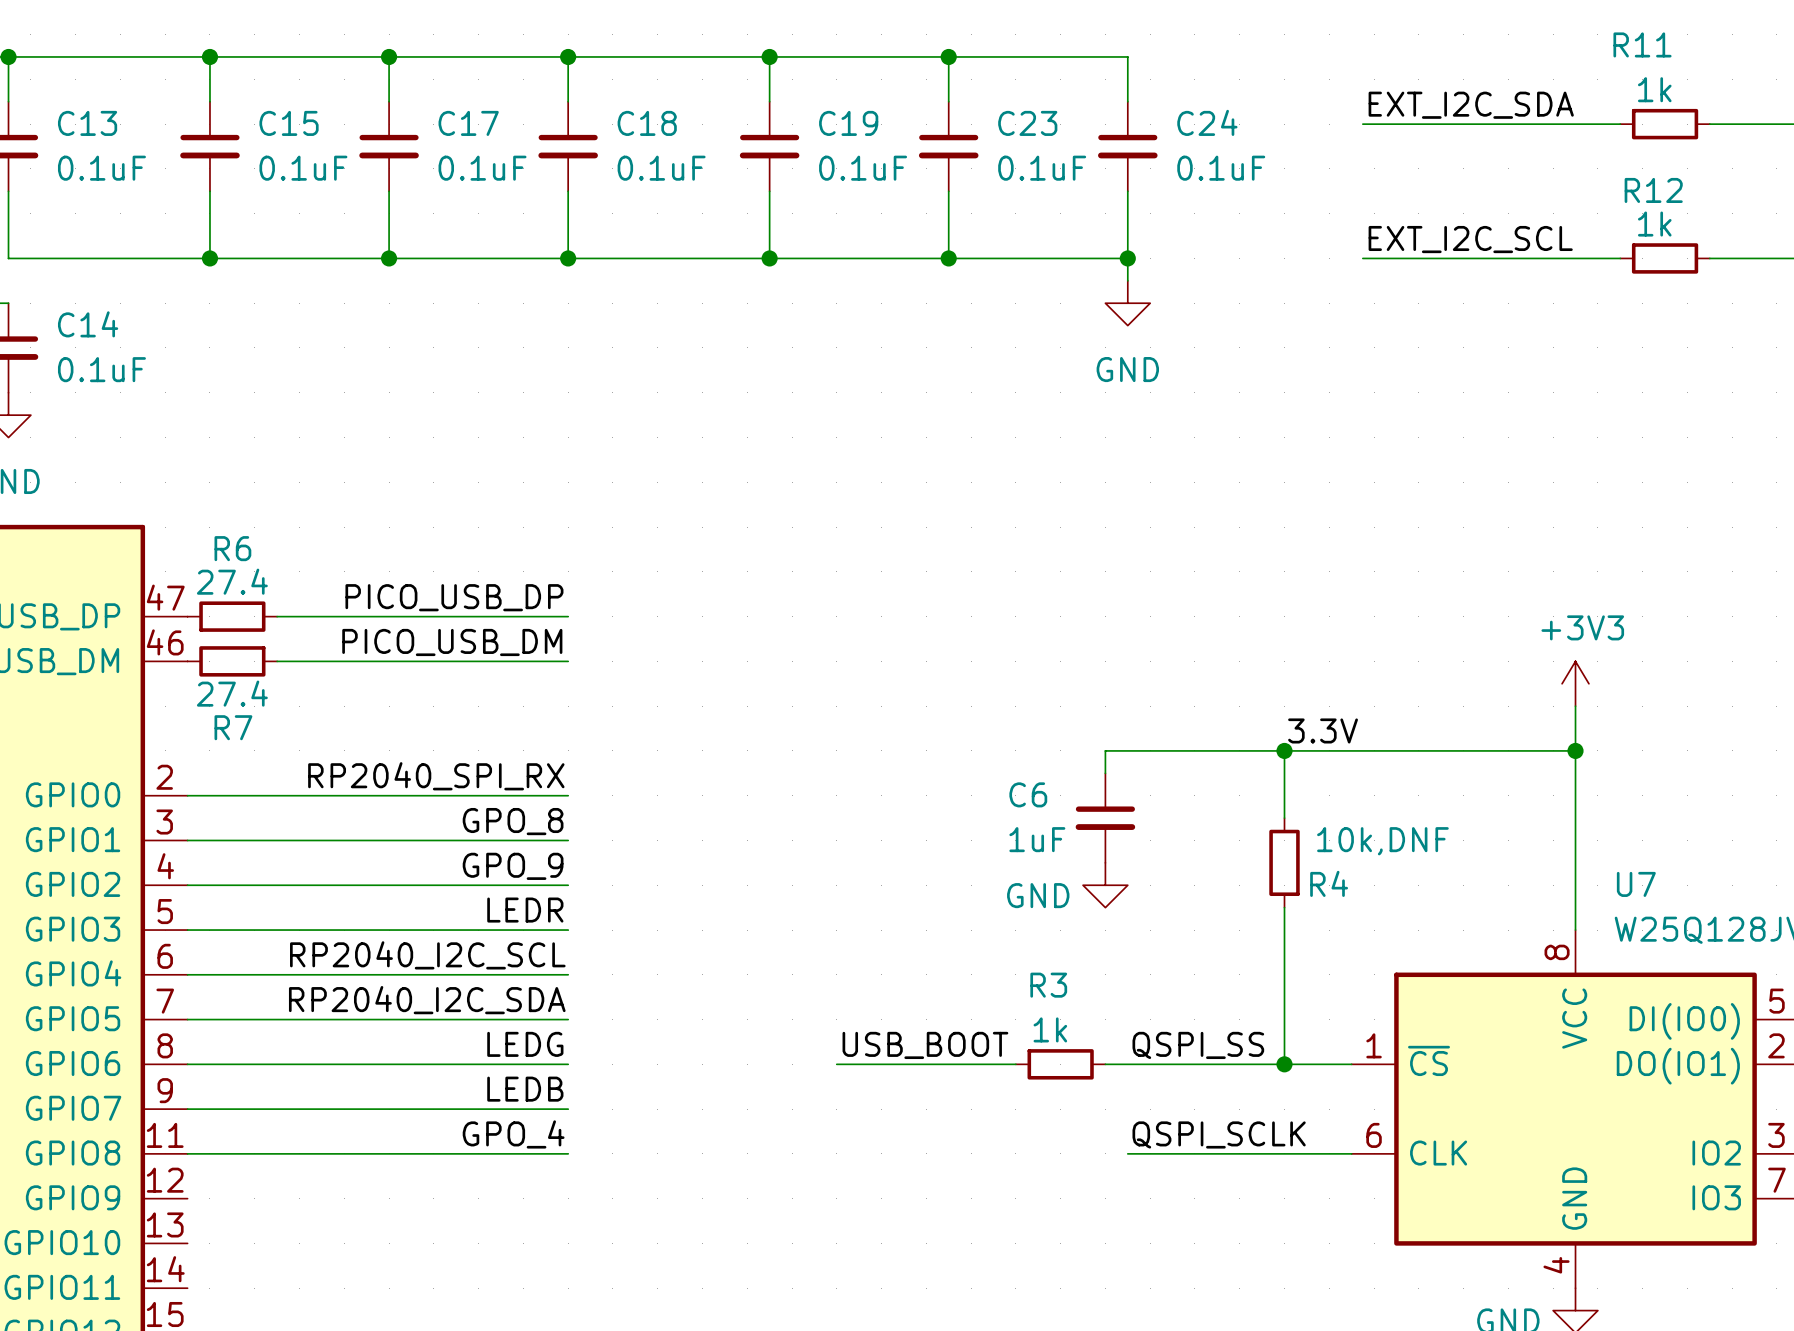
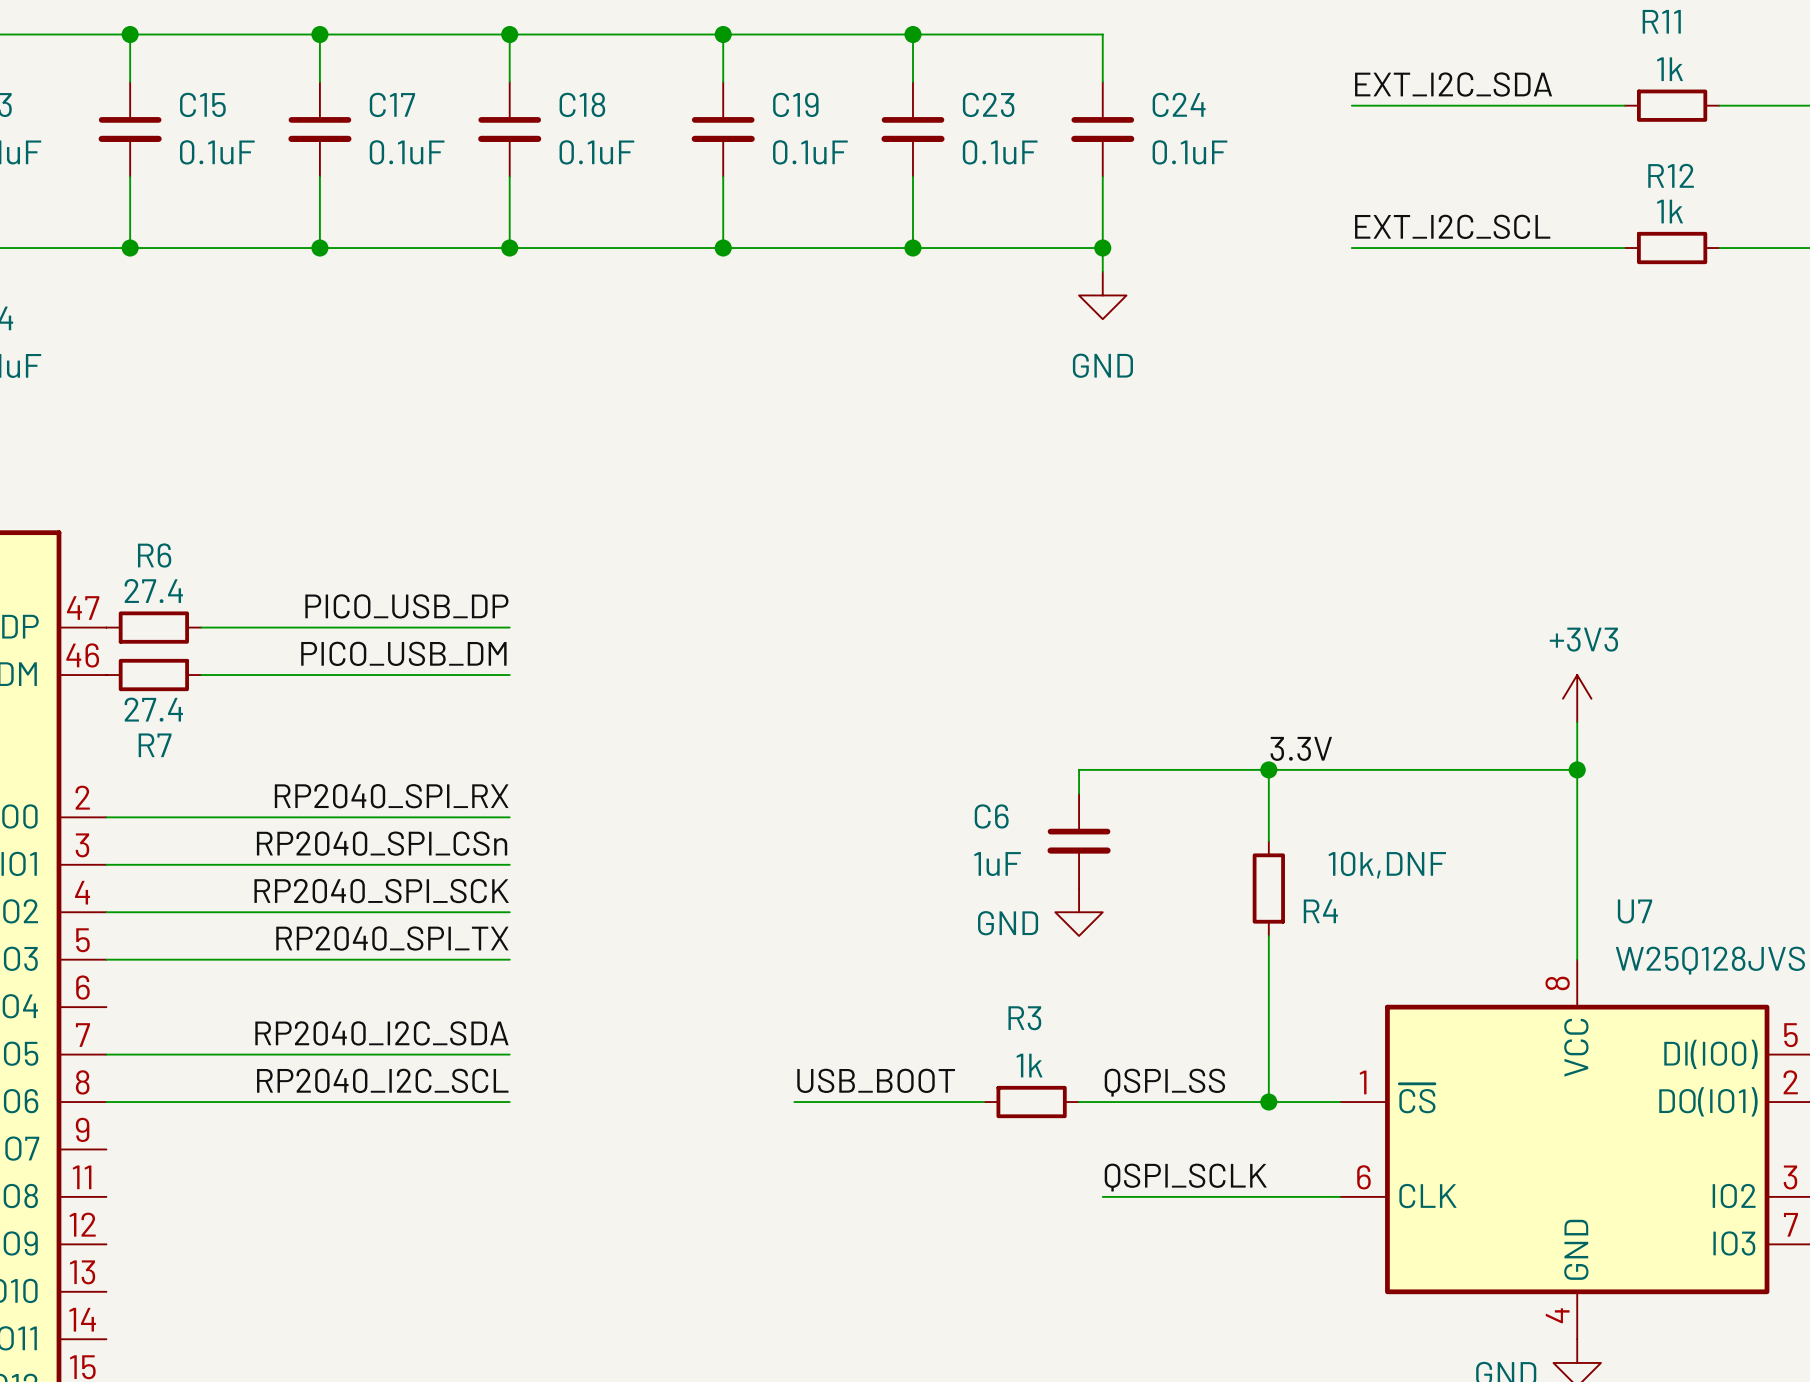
label: GPO_8 (513, 821) -> RP2040_SPI_CSn (382, 843)
label: GPO_9 (513, 866) -> RP2040_SPI_SCK (381, 891)
label: LEDR (525, 910) -> RP2040_SPI_TX (392, 938)
label: RP2040_I2C_SCL (427, 955) -> none
wire: (187, 974) (568, 974) -> none
label: LEDG (525, 1044) -> RP2040_I2C_SCL (382, 1080)
label: LEDB (525, 1089) -> none
wire: (187, 1109) (568, 1109) -> none
label: GPO_4 (513, 1134) -> none
wire: (187, 1153) (568, 1153) -> none

